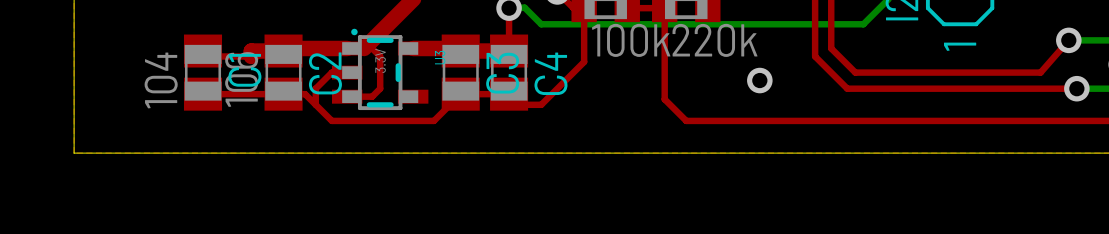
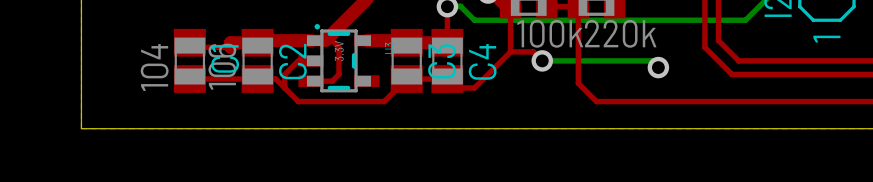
top track: none -> (510, 51) (533, 51) (542, 60)
bottom track: none -> (542, 60) (651, 60) (658, 67)
via: none -> (542, 60)

